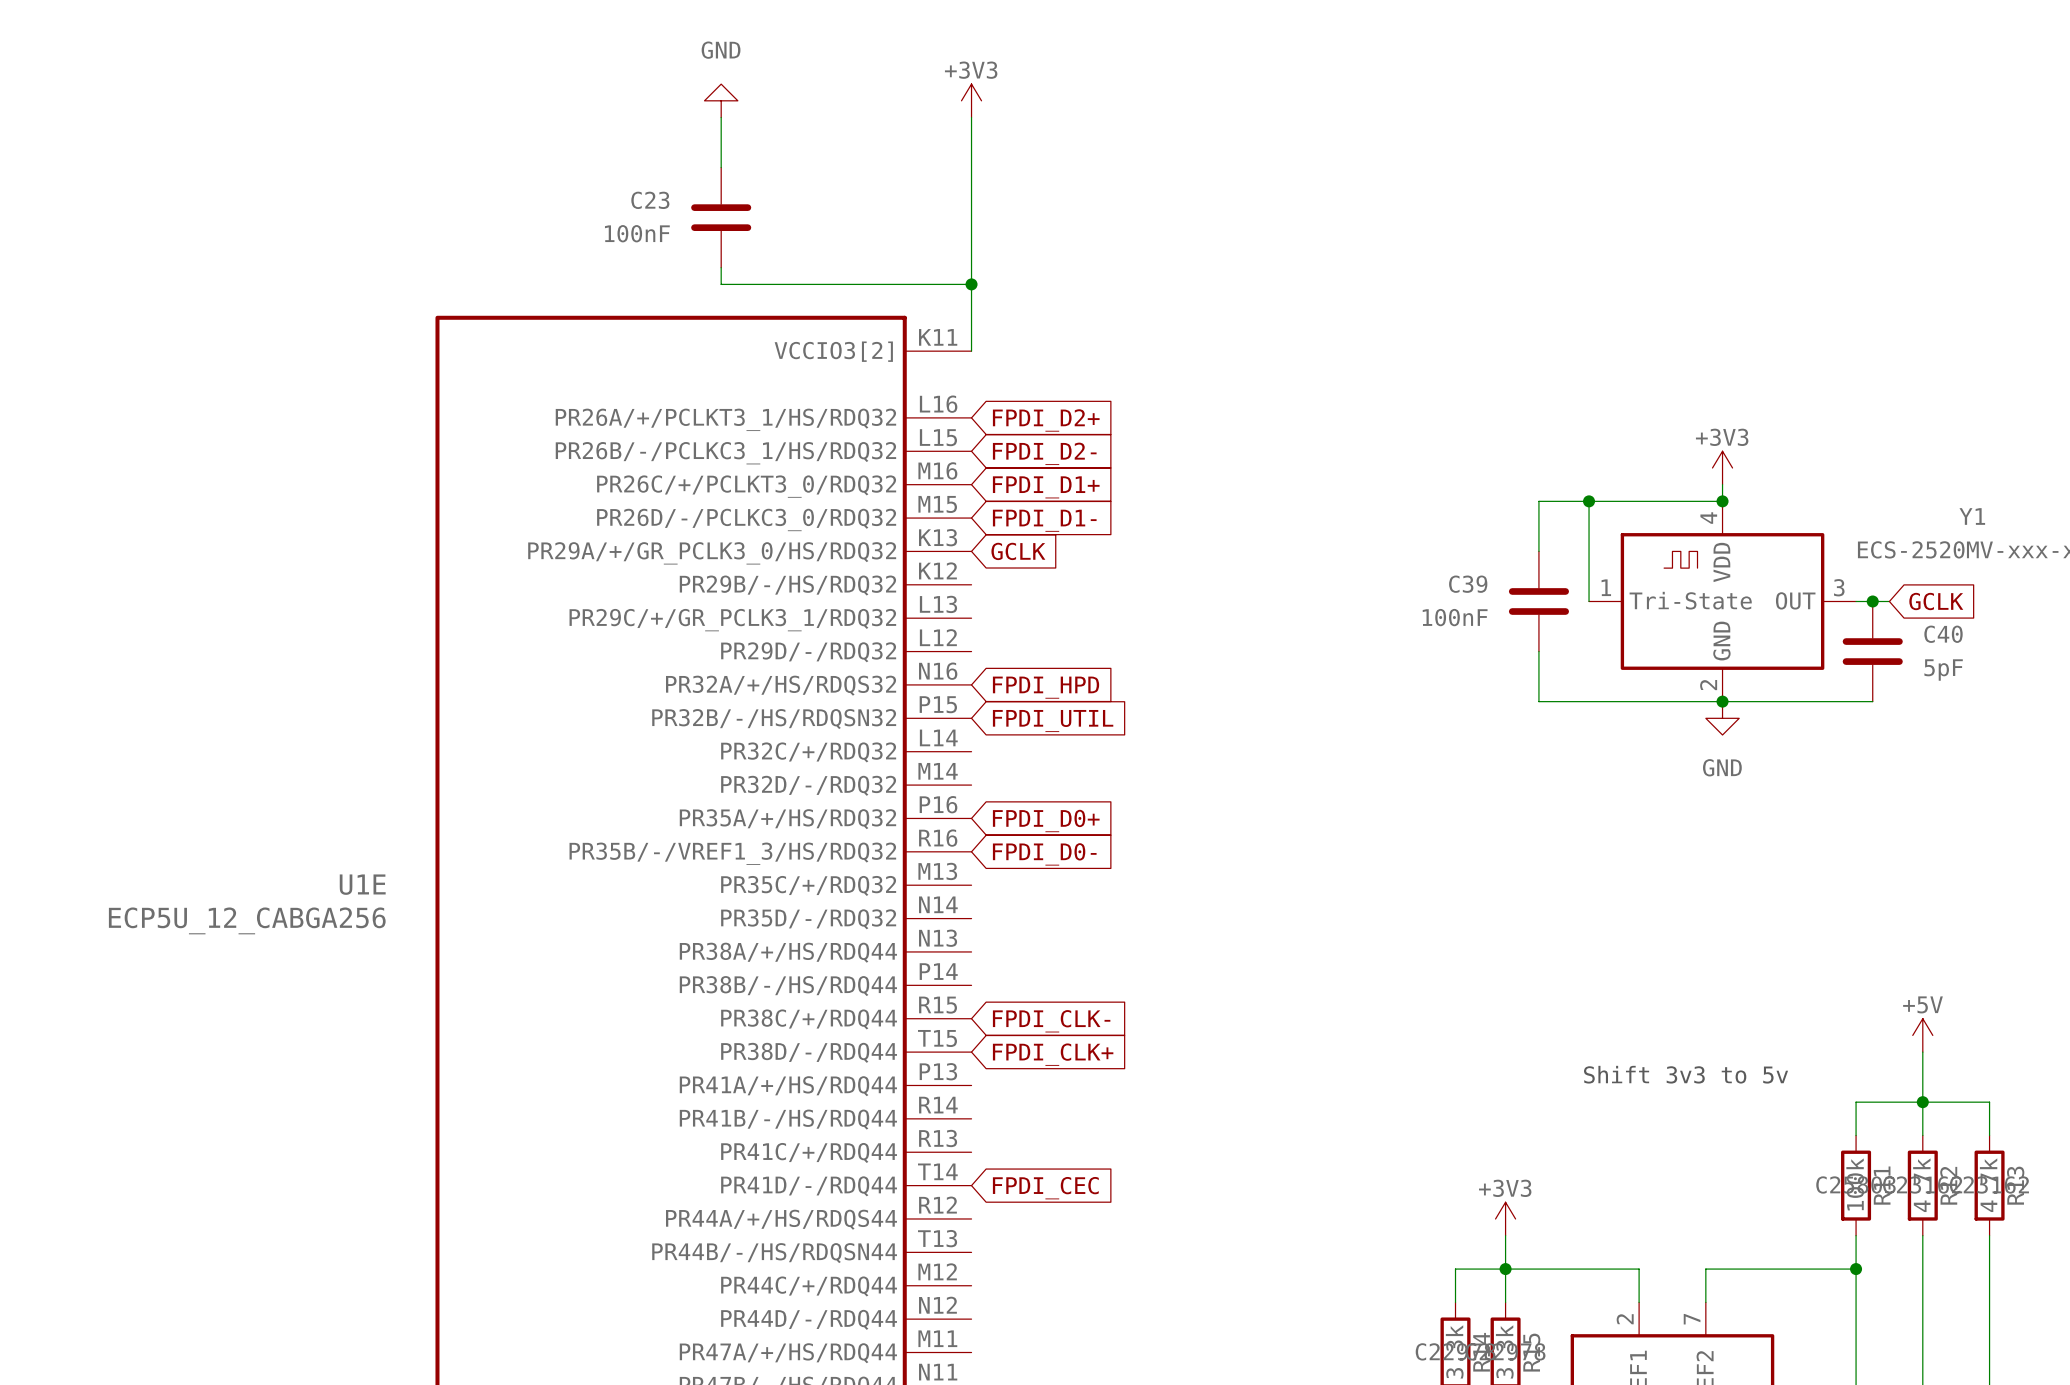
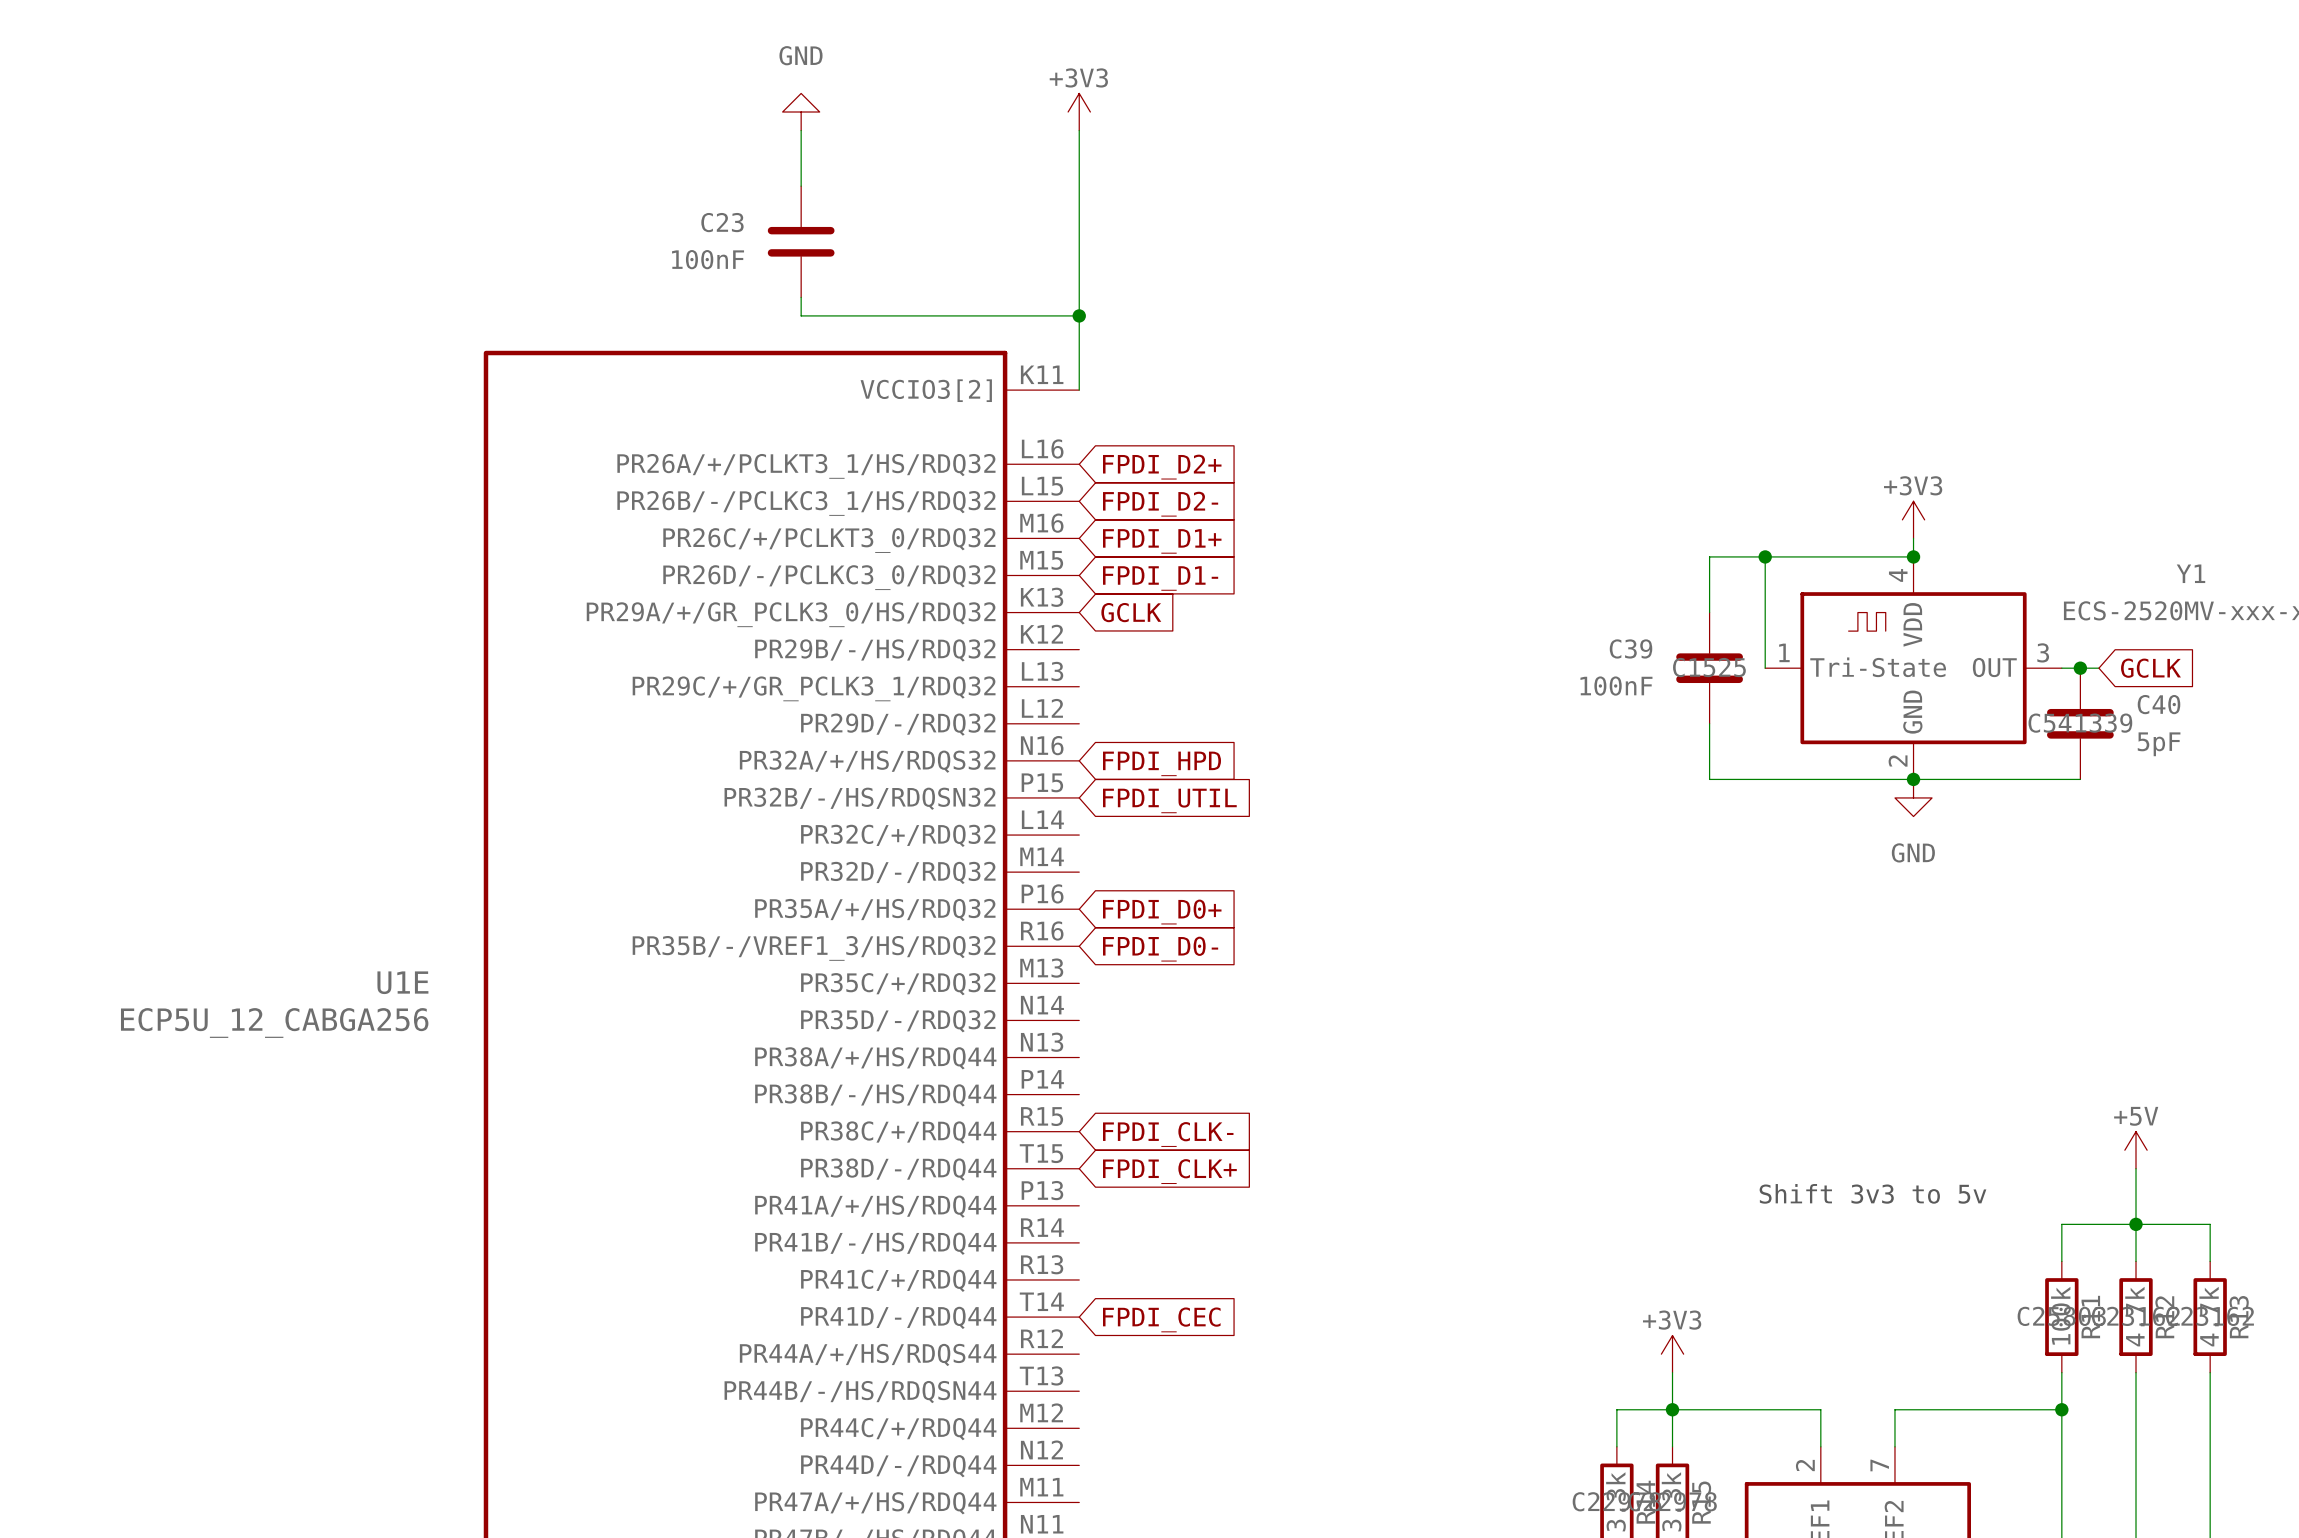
C39 text: none -> C1525 (1709, 667)
C40 text: none -> C541339 (2080, 723)

